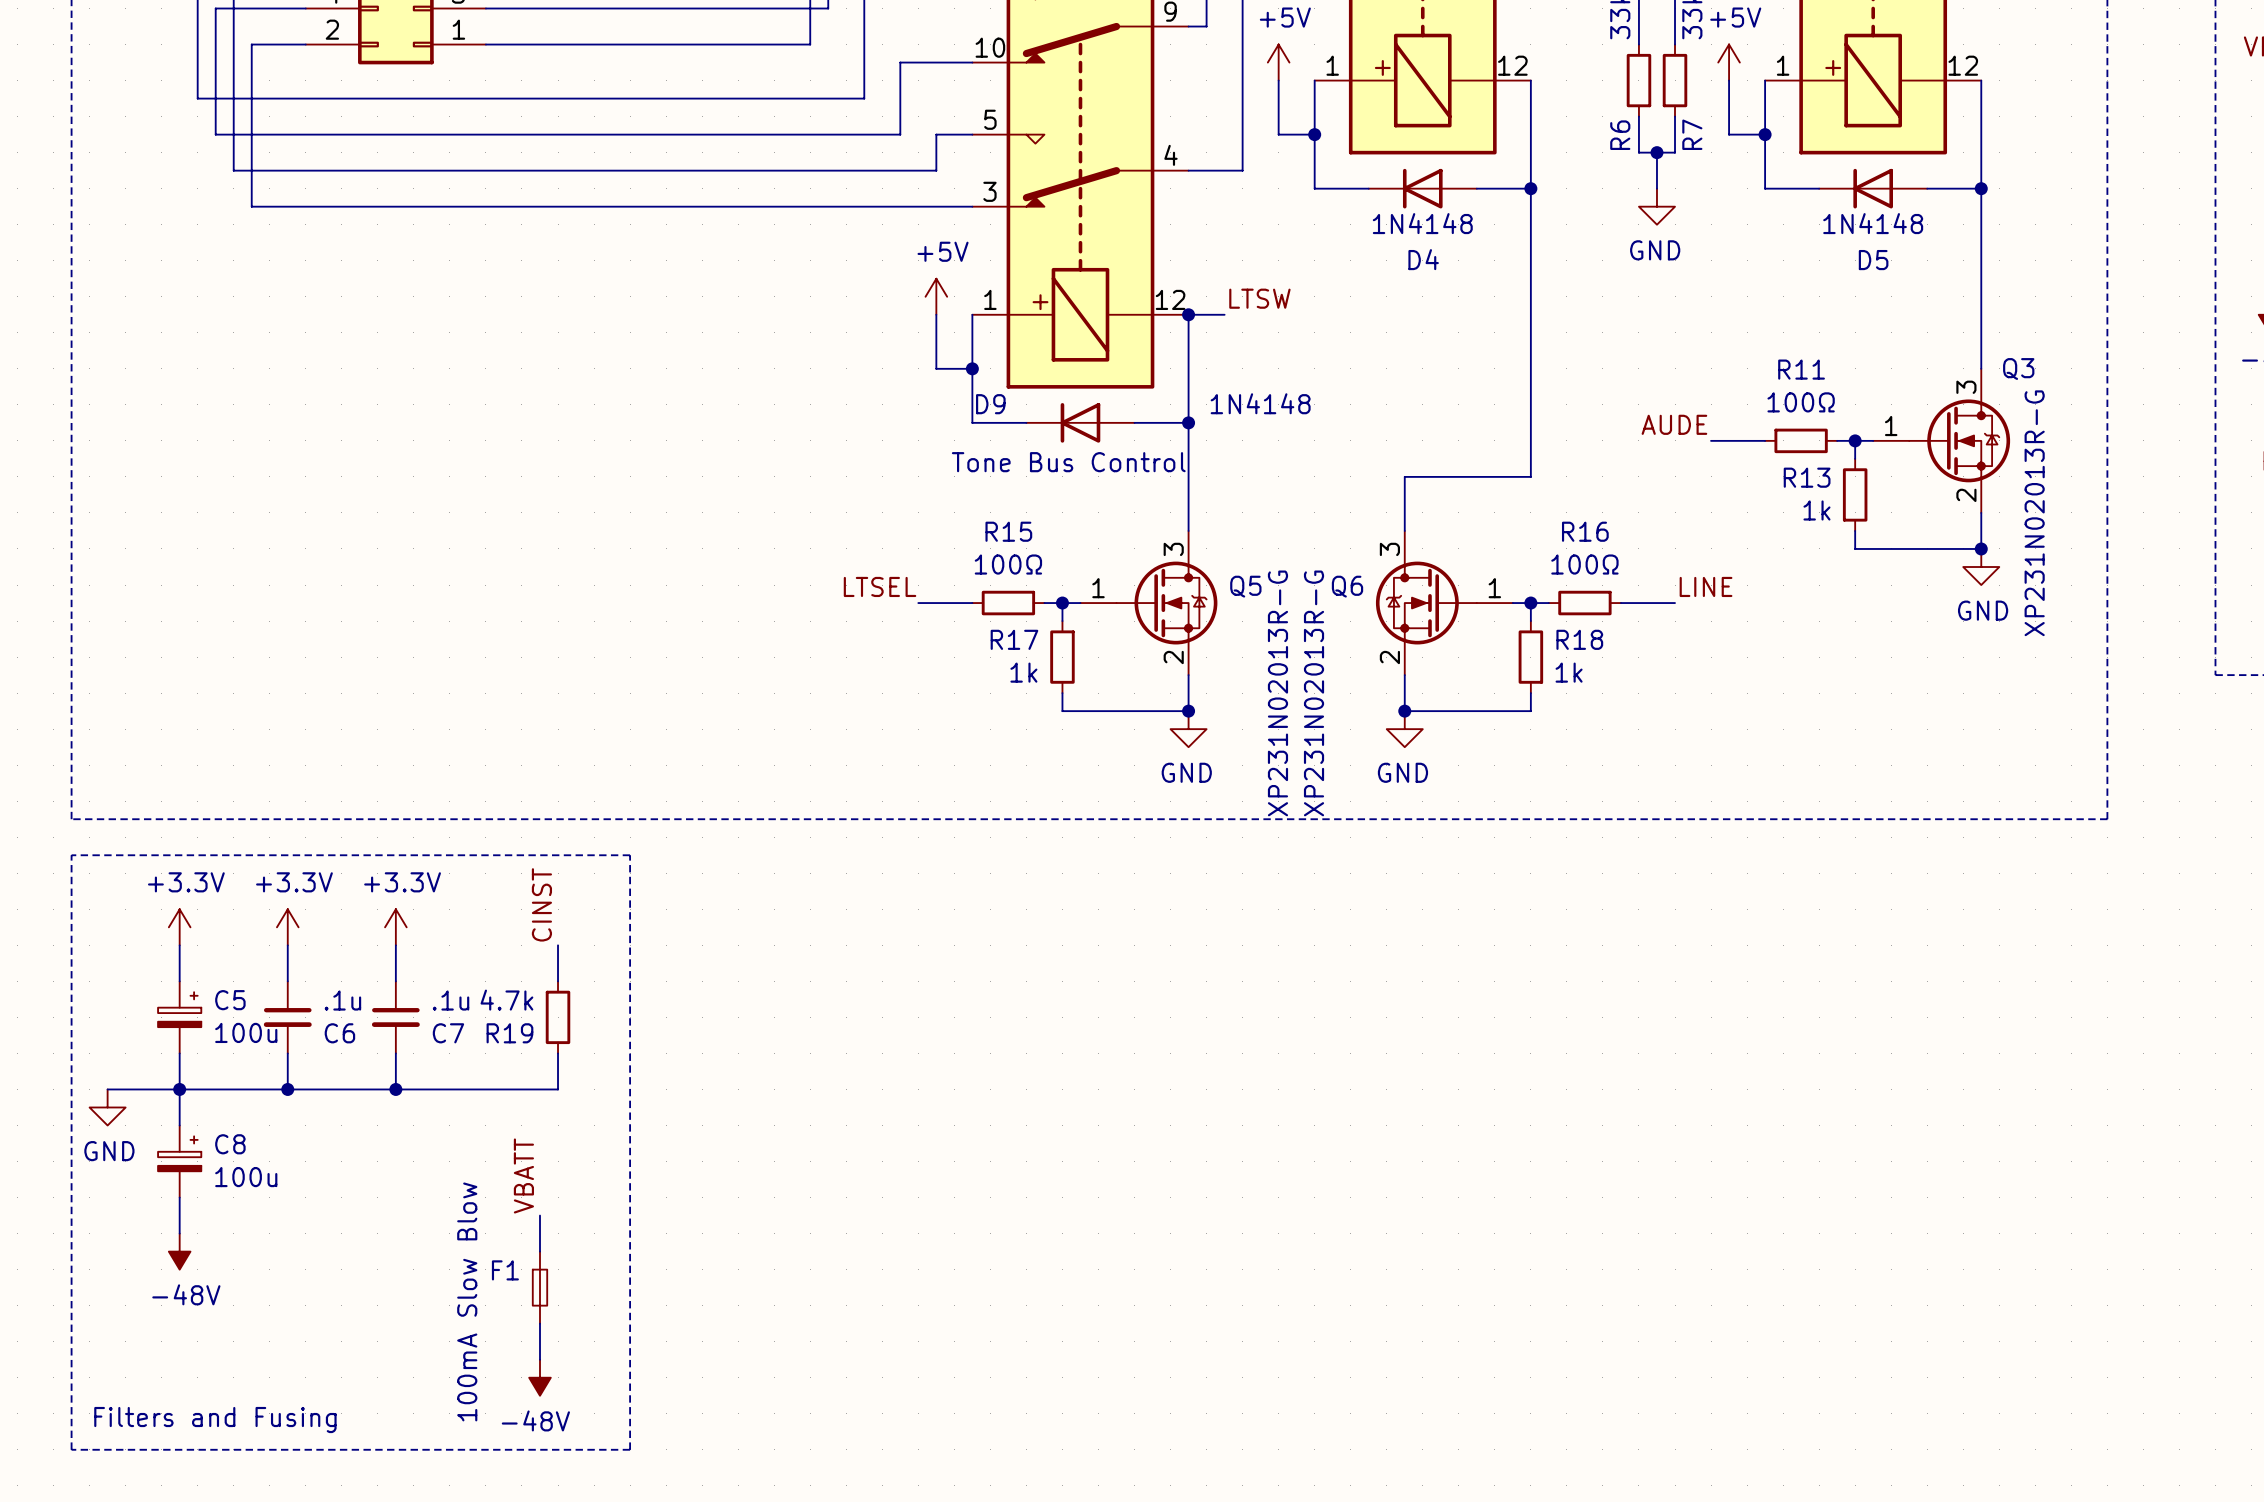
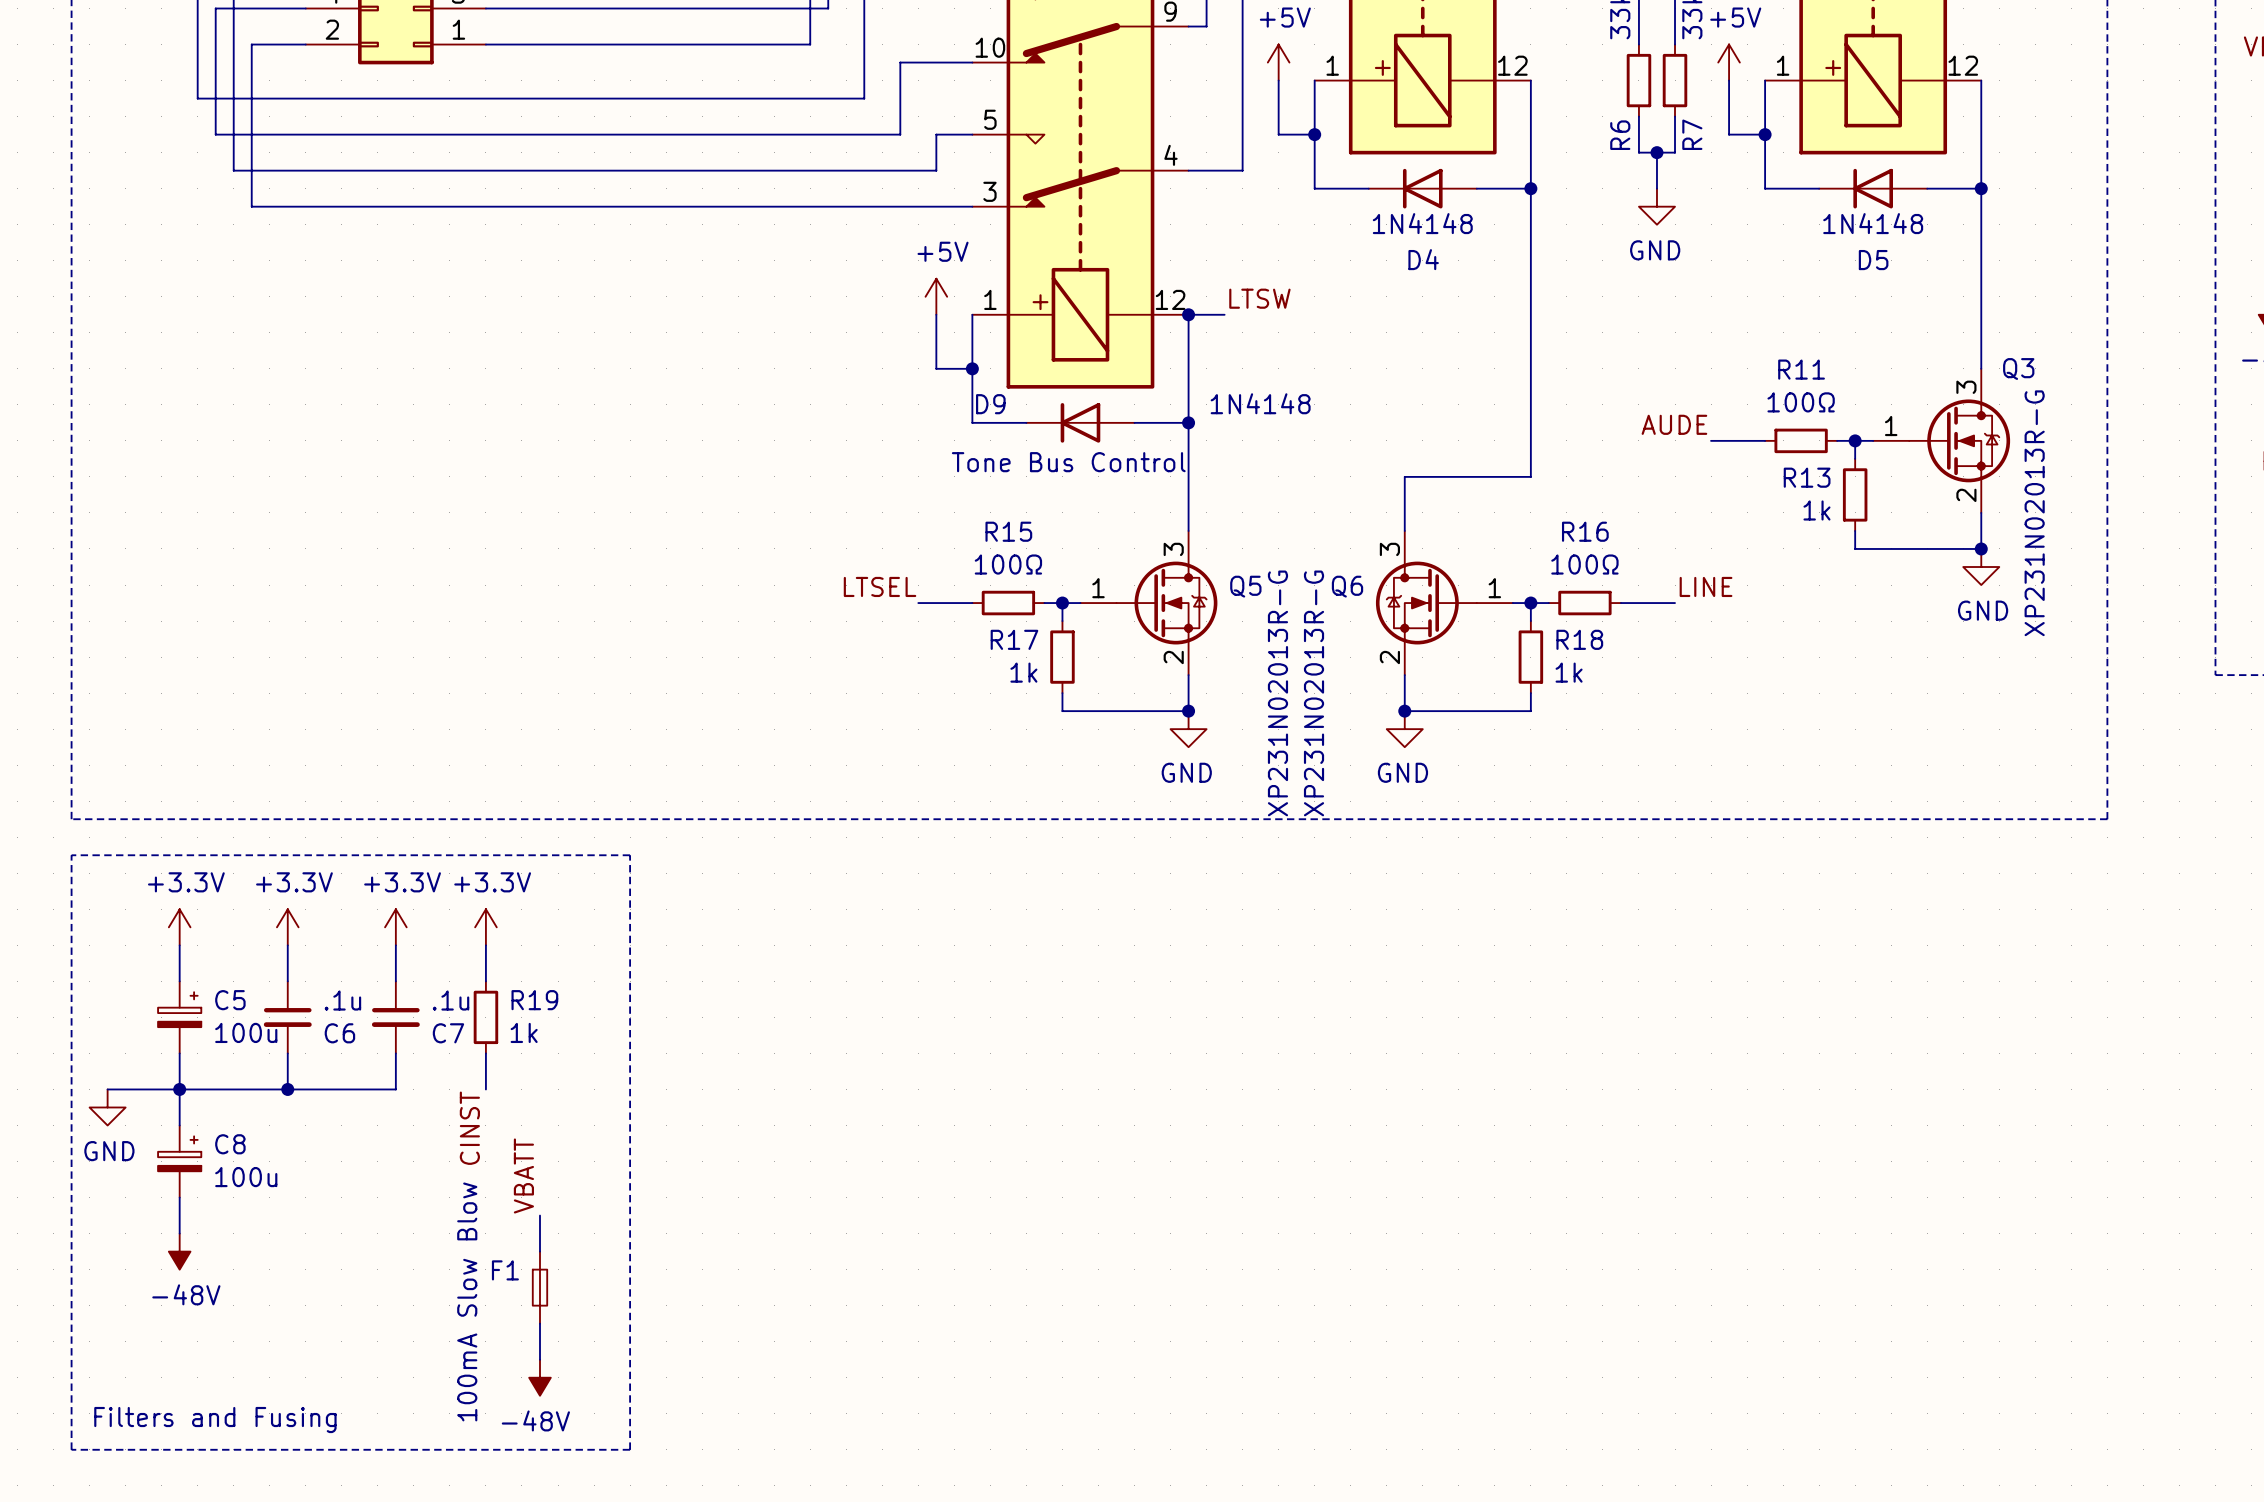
label position: CINST (541, 904) -> CINST (469, 1128)
power symbol: none -> +3.3V (485, 927)
wire: (558, 945) (558, 981) -> (485, 945) (485, 981)
R19 value: 4.7k (506, 1000) -> 1k (524, 1032)
R19 position: (558, 1017) -> (485, 1017)
R19 name position: R19 (509, 1033) -> R19 (534, 1000)
wire: none -> (485, 1053) (485, 1089)
wire: (558, 1053) (558, 1089) (395, 1089) -> none
junction: (395, 1089) -> none

